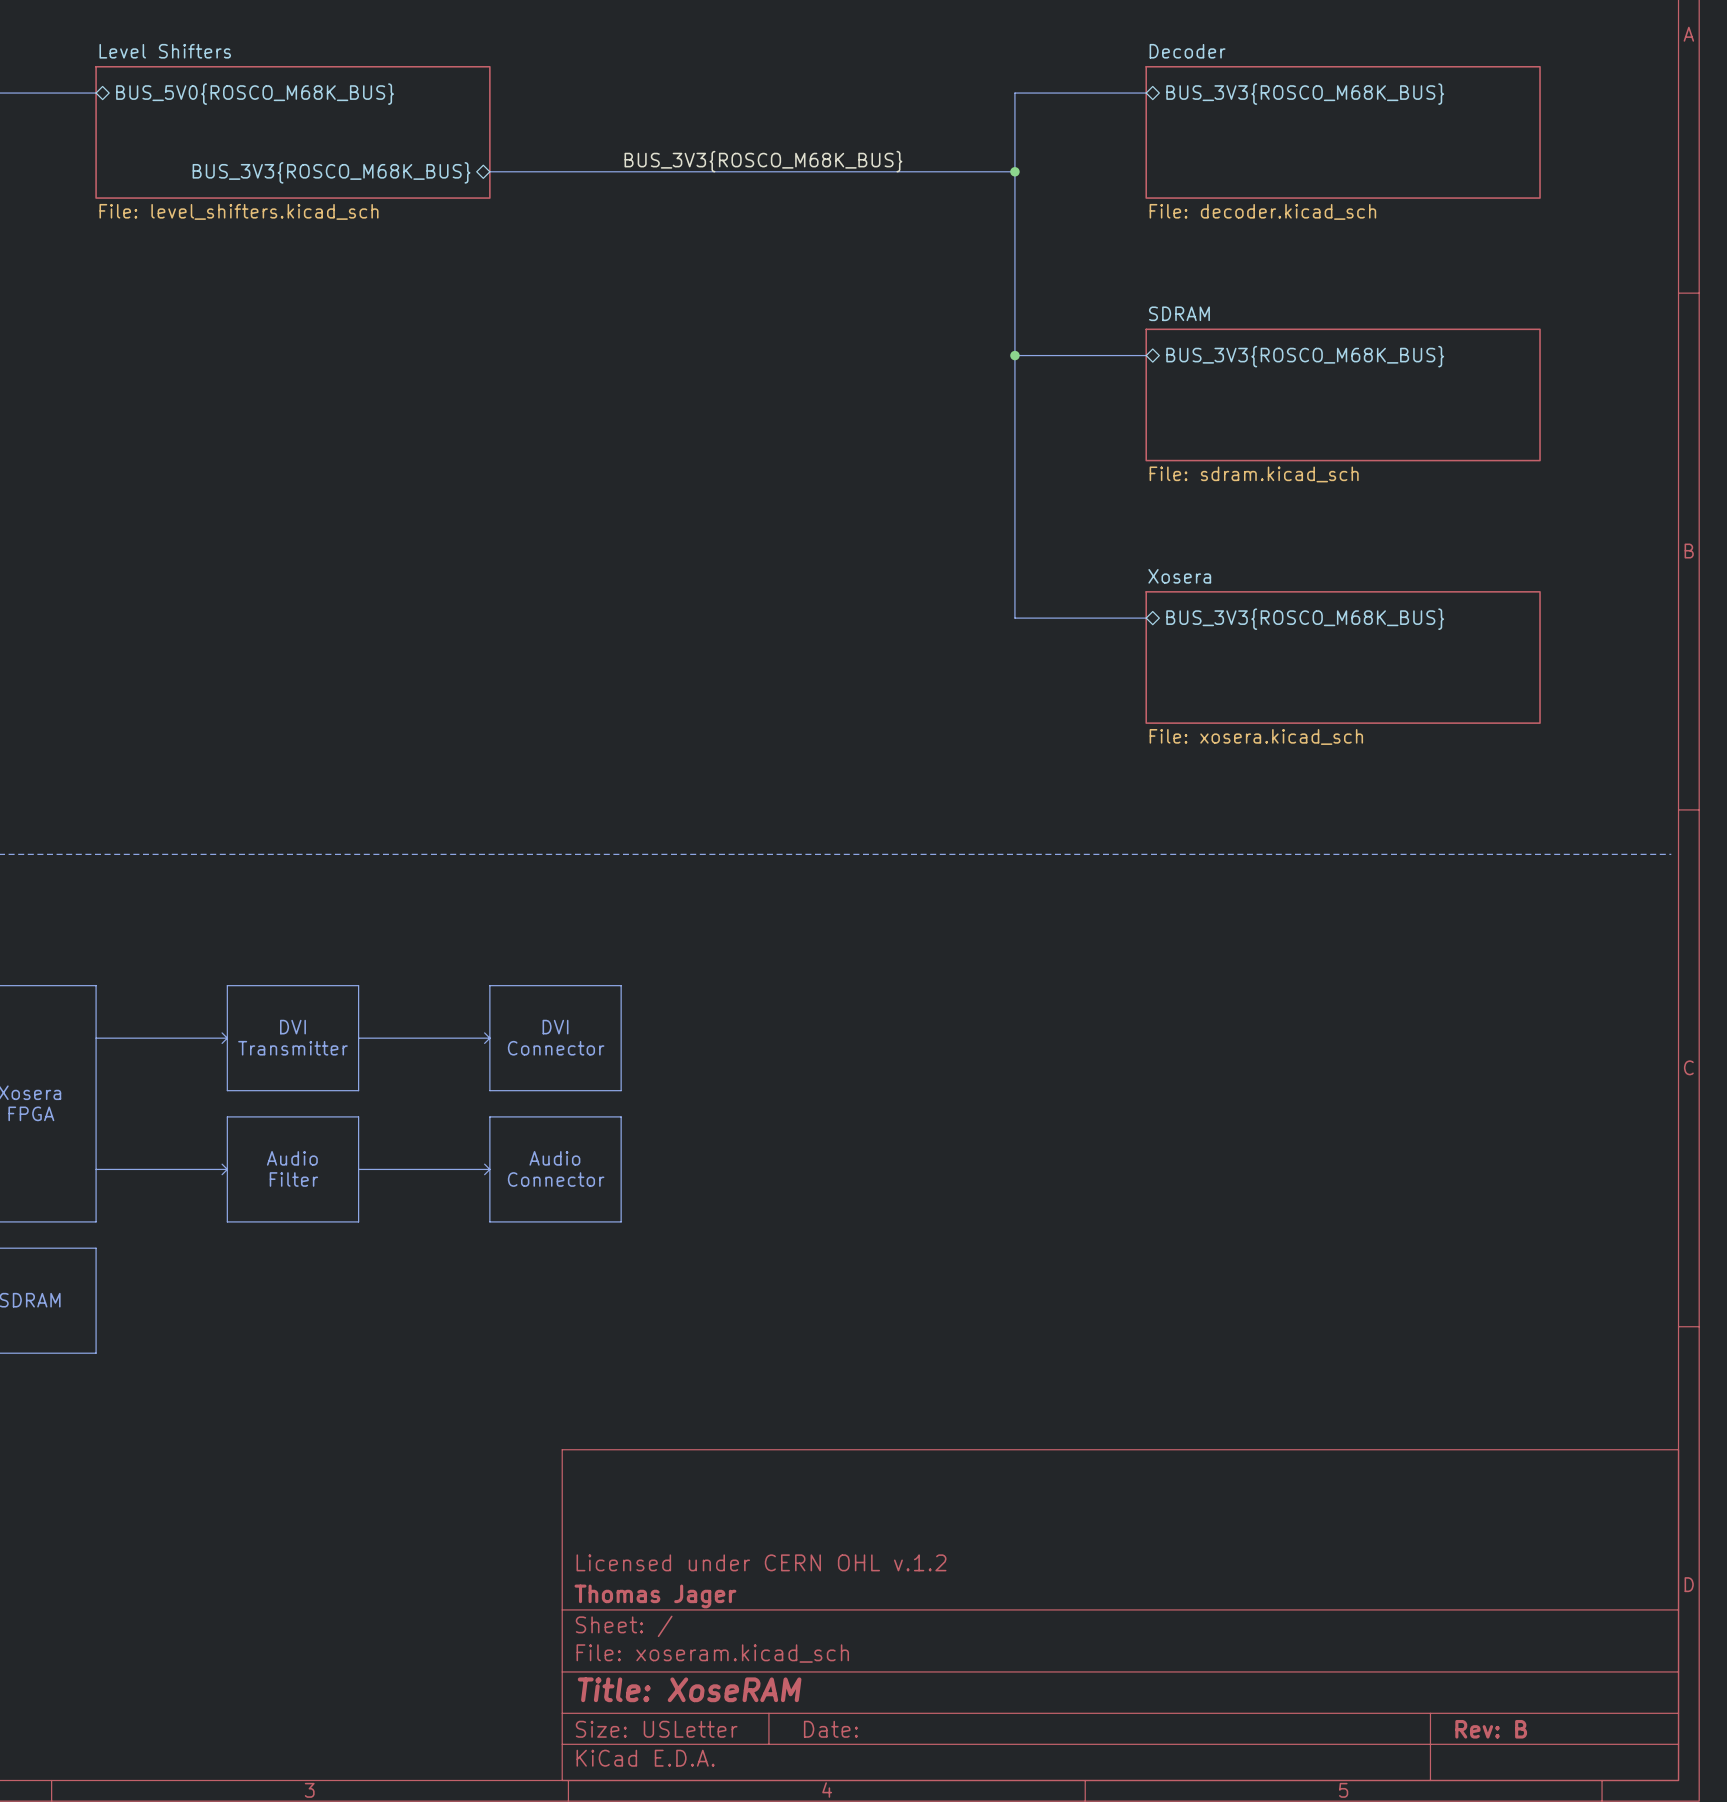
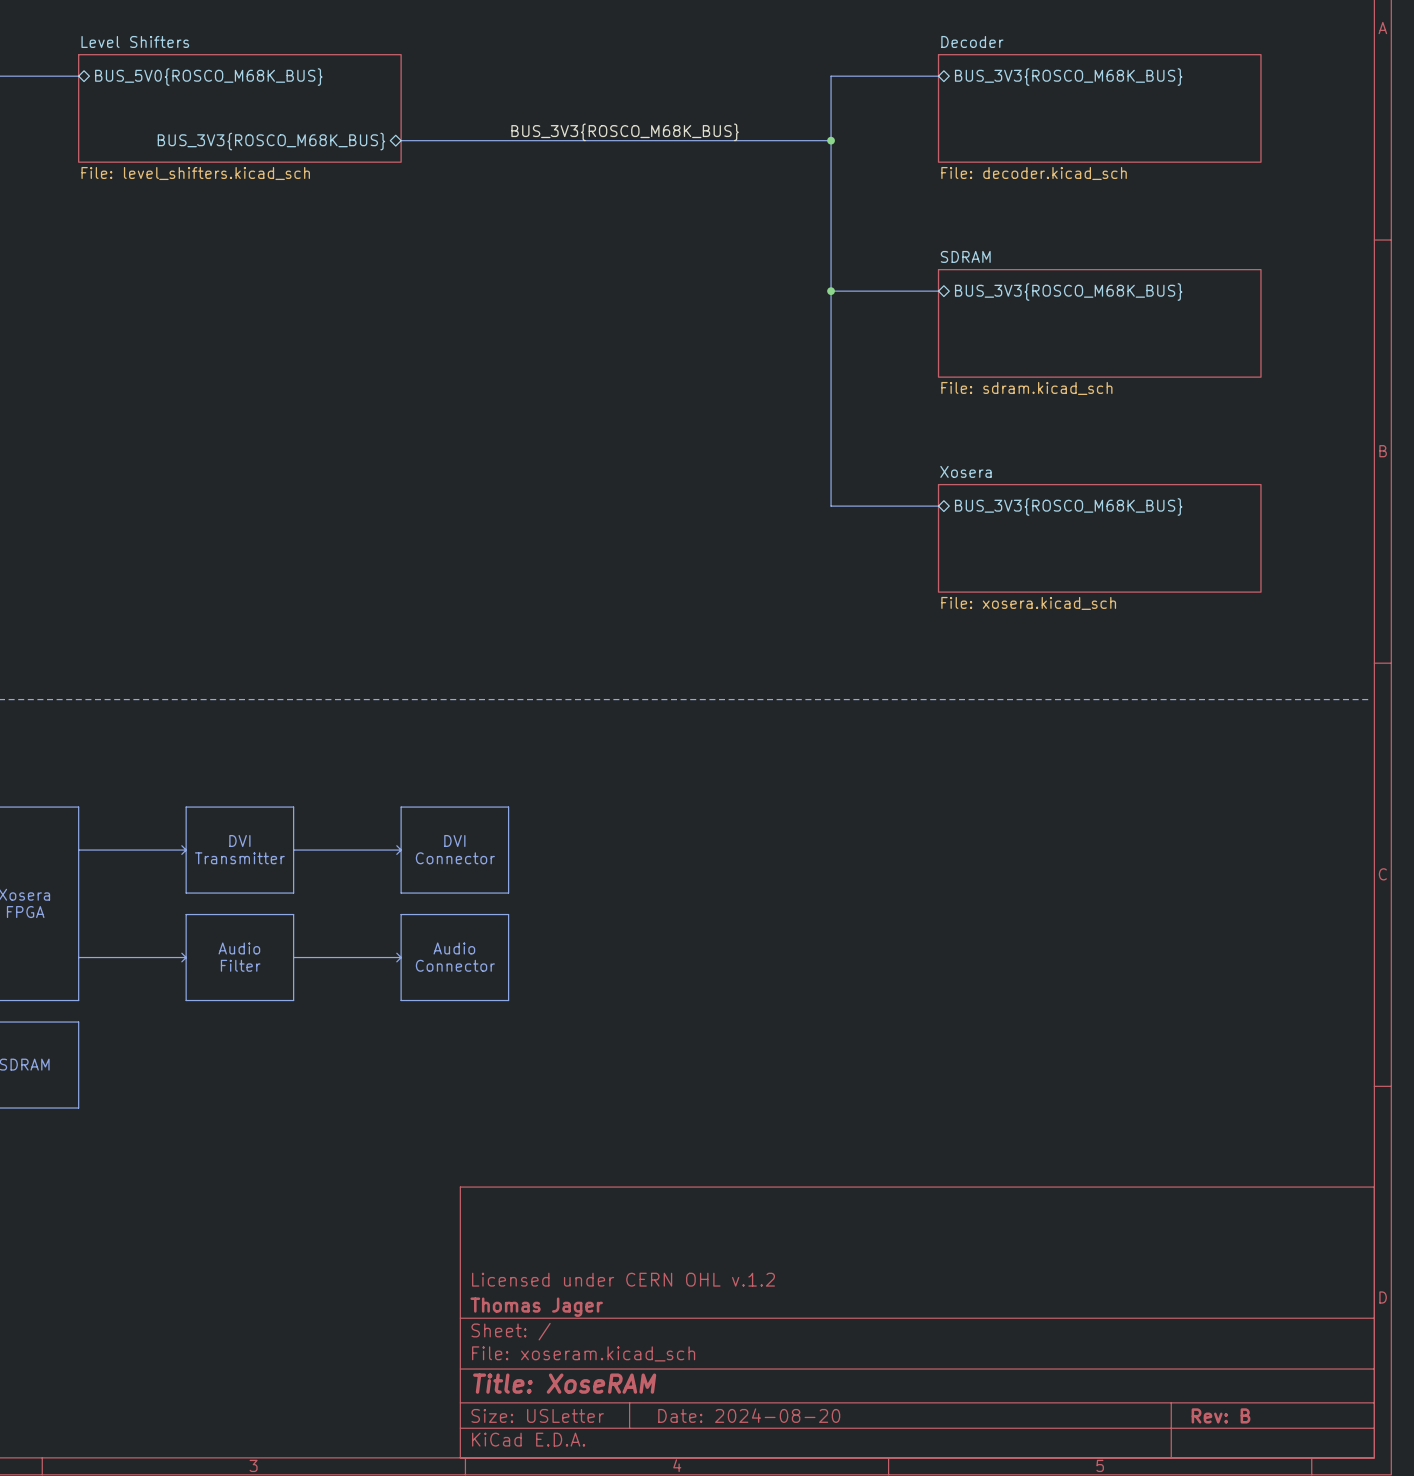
title block: Date: (830, 1729) -> Date: 2024-08-20 (749, 1415)

